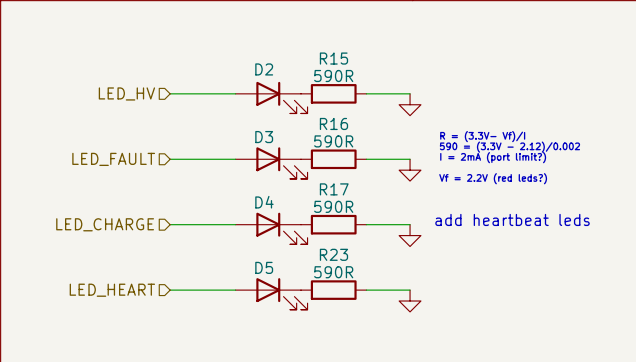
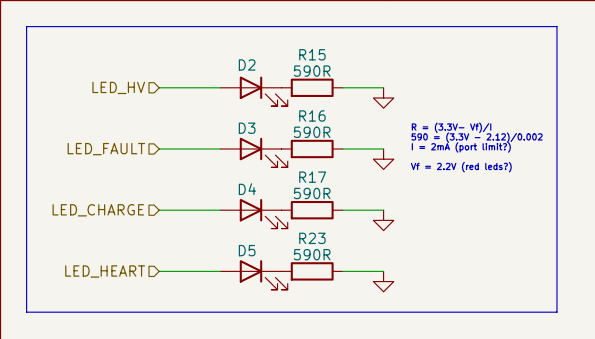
line: none -> (26, 26) (556, 26) (556, 312) (26, 312) (26, 26)
text: add heartbeat leds (512, 219) -> none

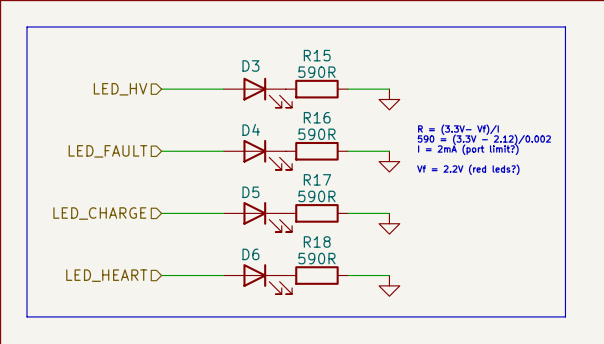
D2 name: D2 (247, 64) -> D3 (250, 65)
D3 name: D3 (247, 128) -> D4 (251, 129)
D4 name: D4 (247, 189) -> D5 (250, 192)
R23 name: R23 (312, 238) -> R18 (317, 242)
D5 name: D5 (247, 250) -> D6 (250, 254)

